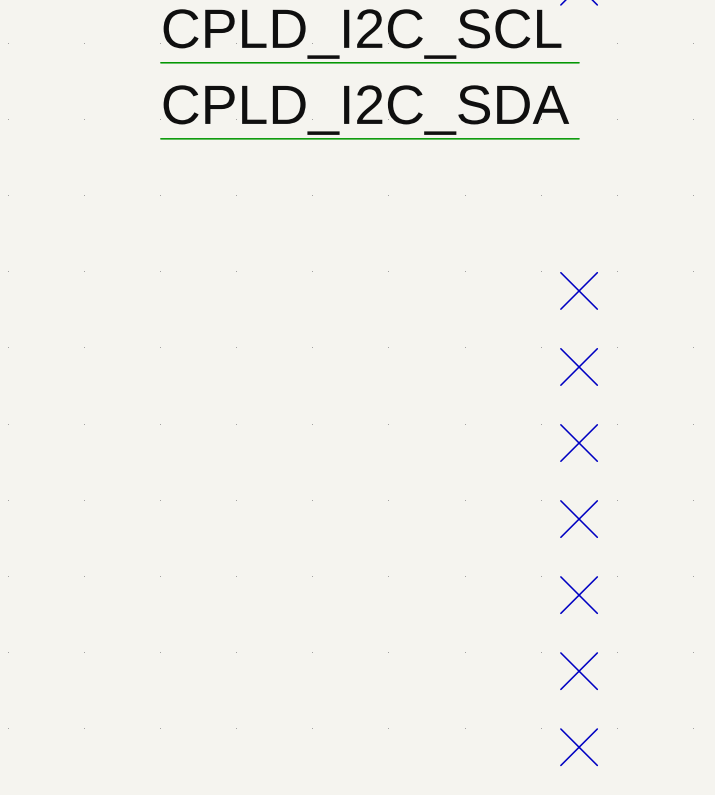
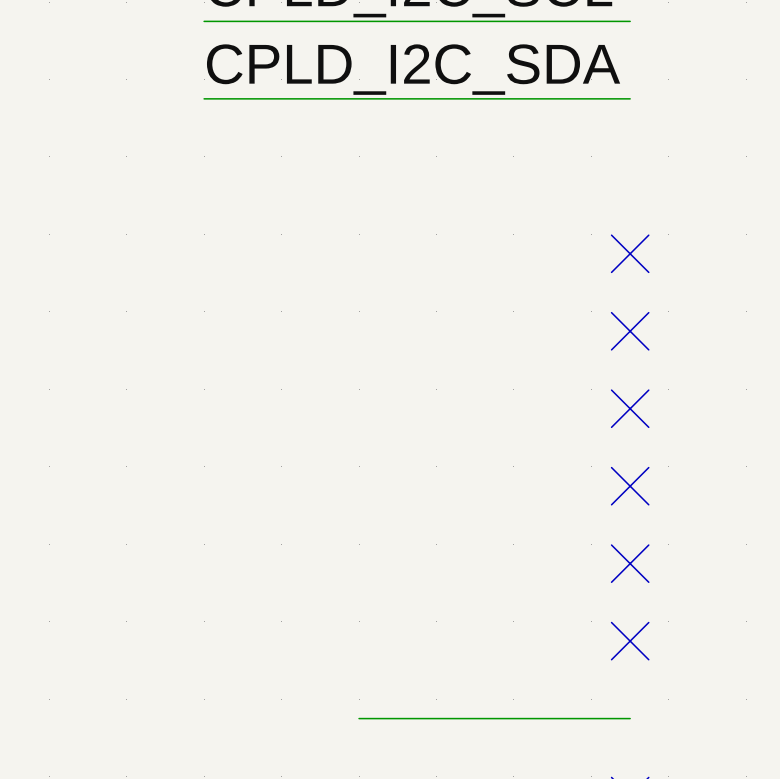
wire: none -> (359, 718) (630, 718)
no-connect mark: (579, 747) -> none

